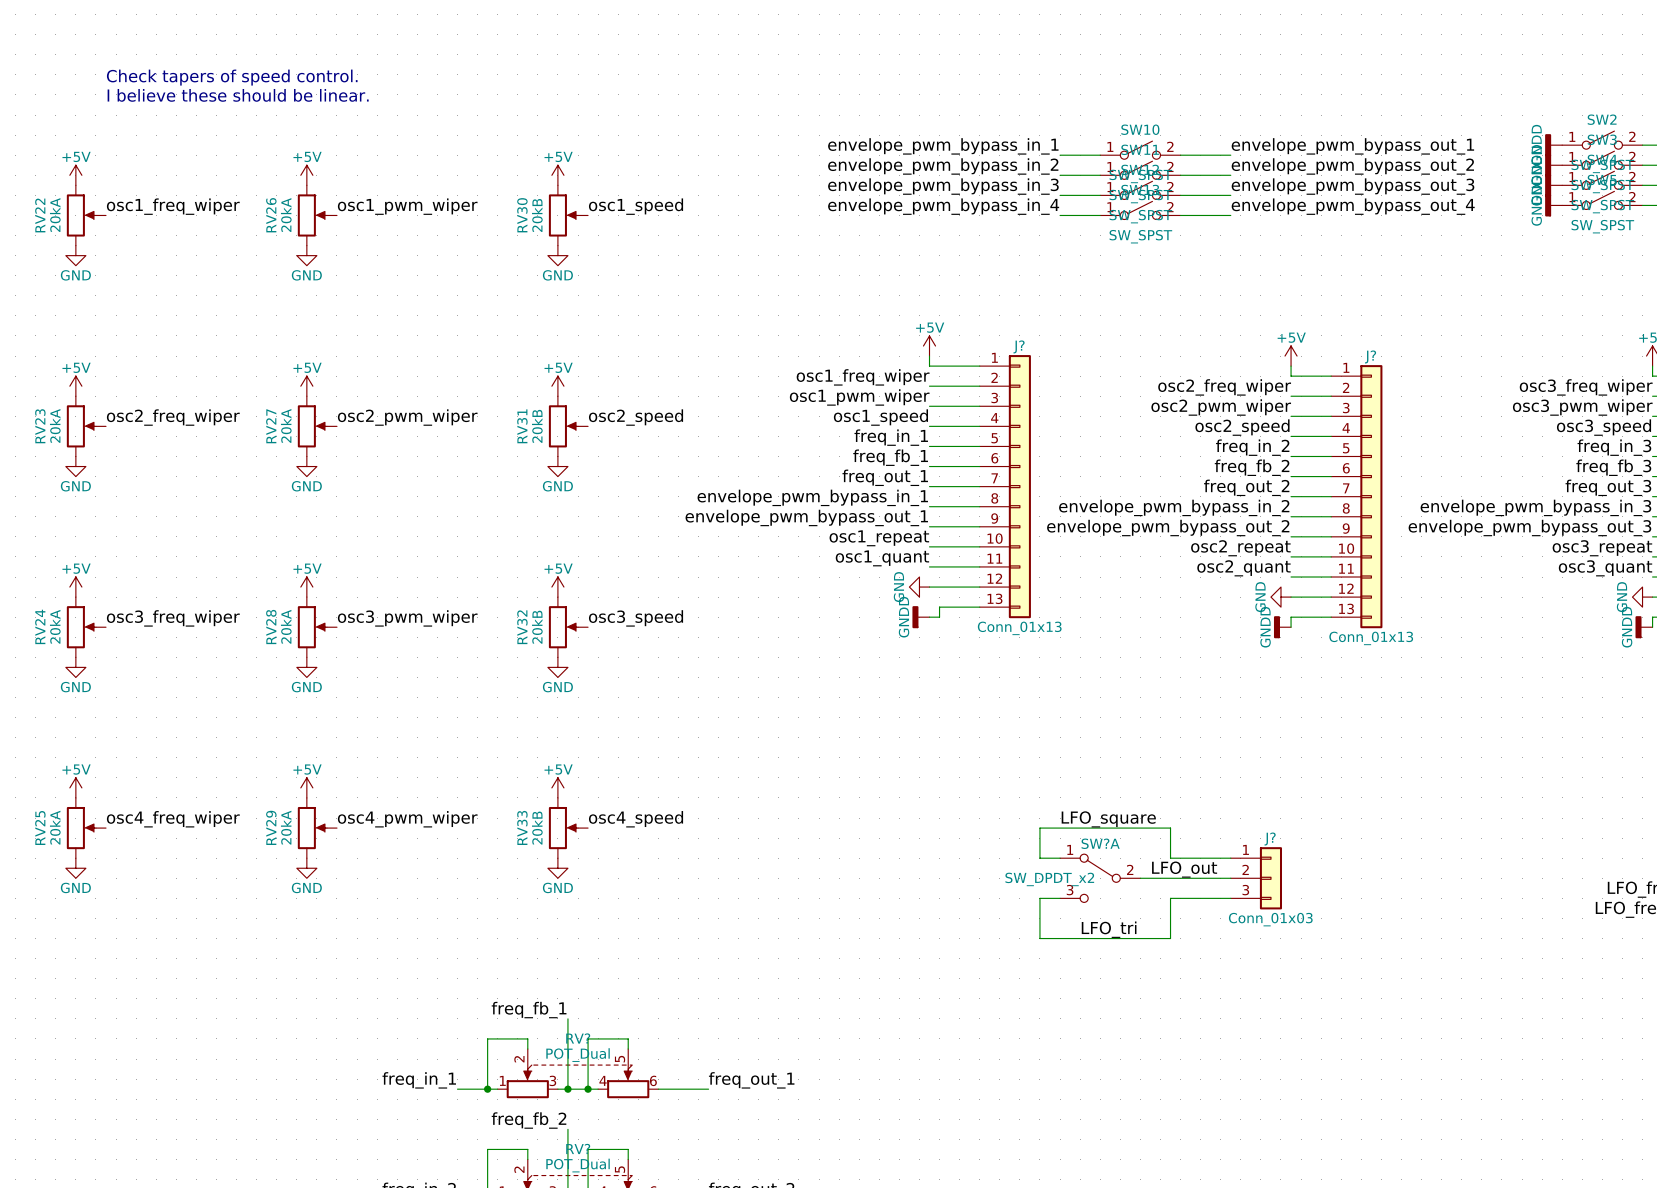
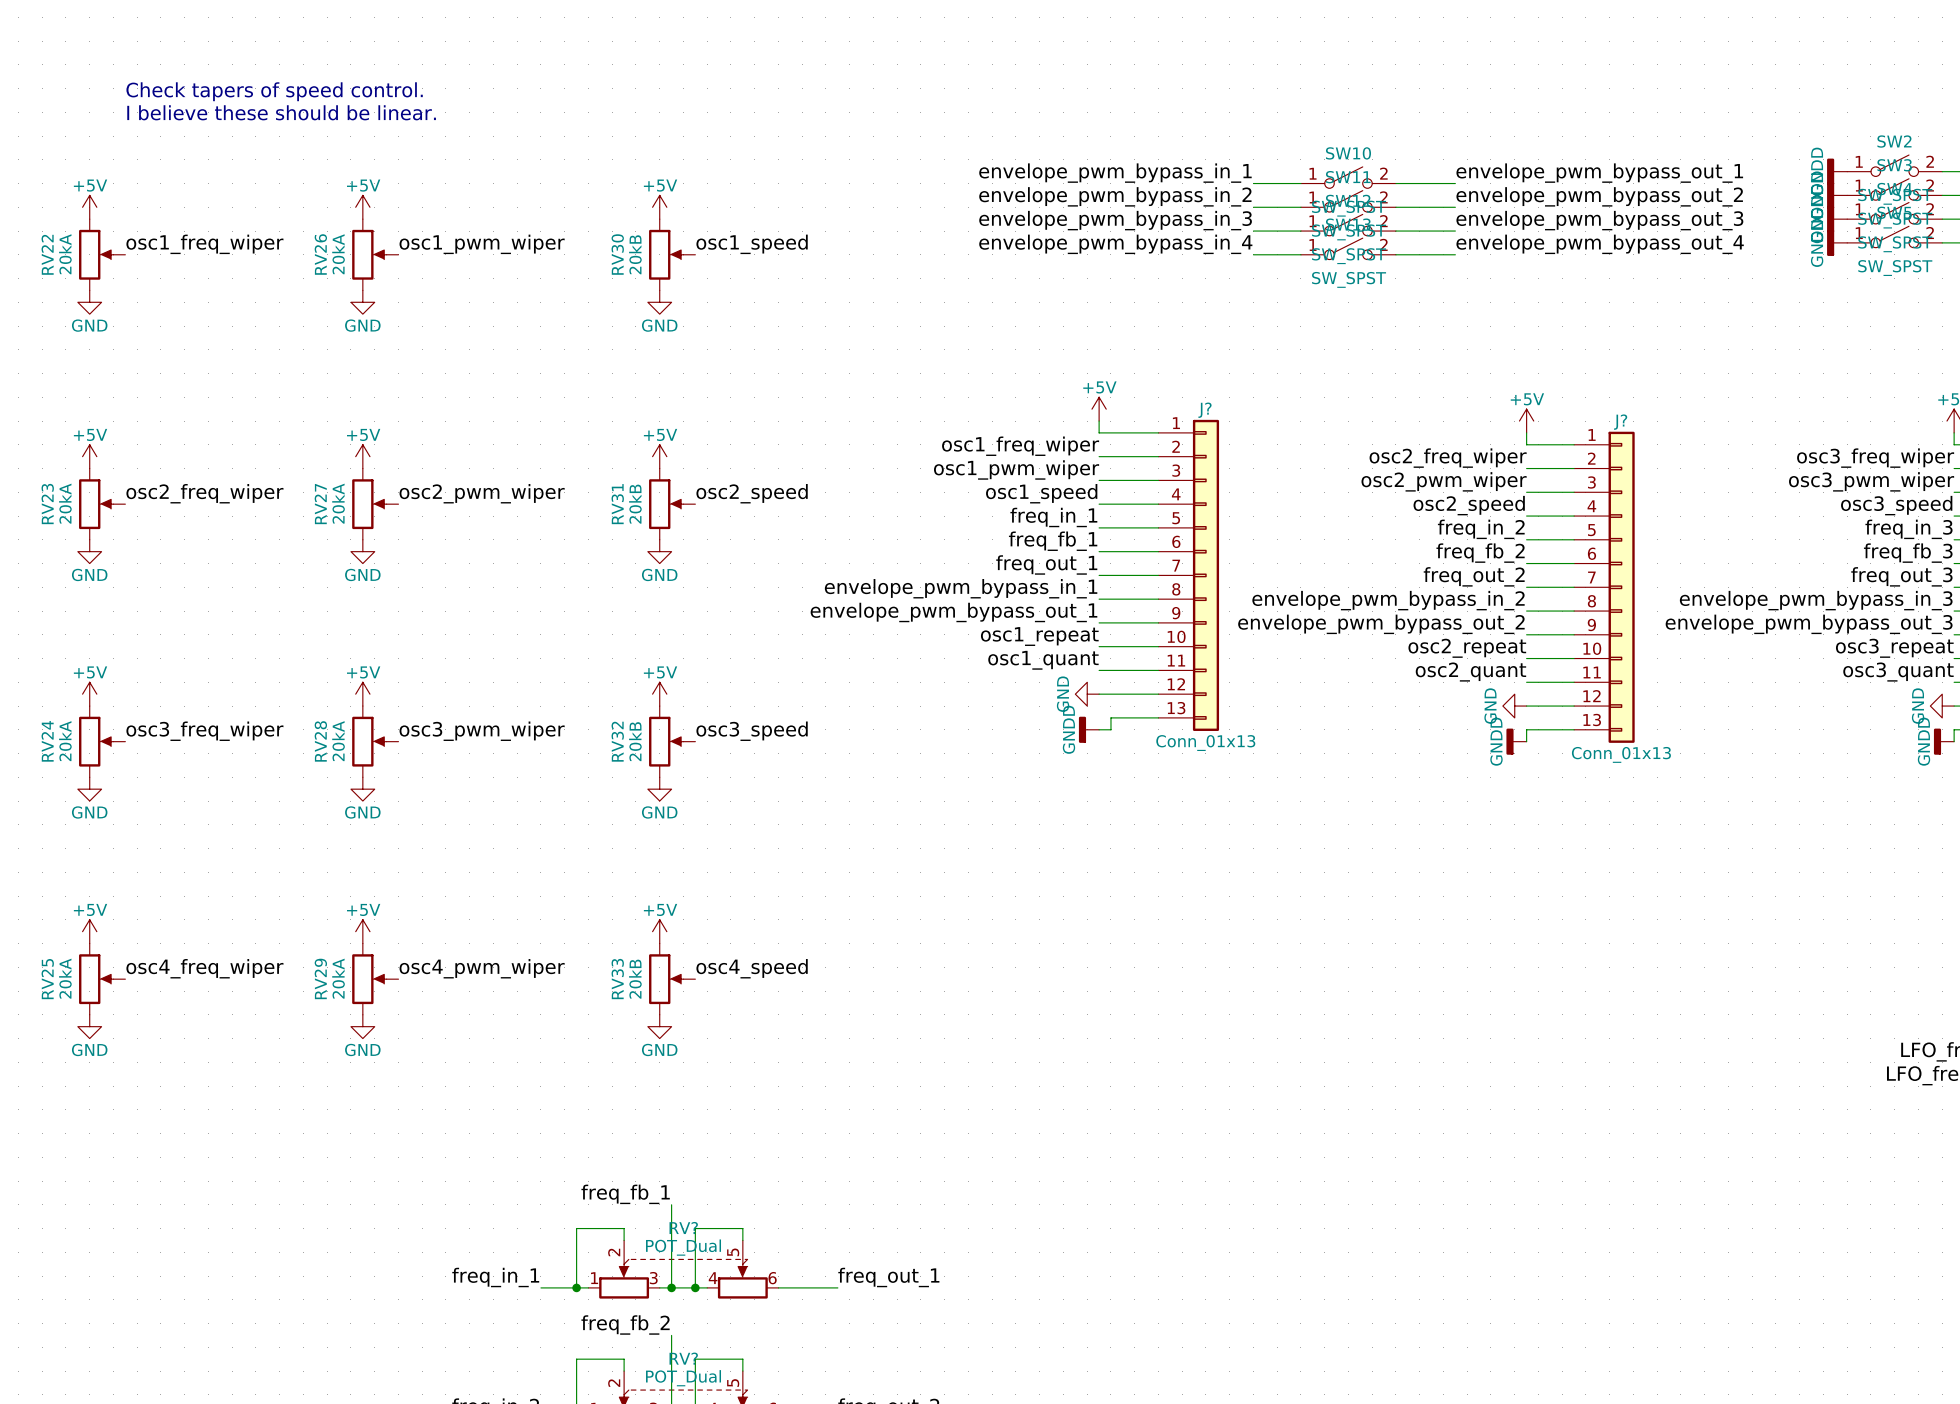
label: LFO_square (1108, 819) -> none
wire: (1060, 858) (1039, 858) (1039, 828) (1170, 828) (1170, 858) (1230, 858) -> none
label: LFO_out (1184, 869) -> none
SW?A: SW_DPDT_x2 (1100, 878) -> none
wire: (1140, 878) (1230, 878) -> none
J?: Conn_01x03 (1256, 878) -> none
wire: (1060, 898) (1039, 898) (1039, 938) (1170, 938) (1170, 898) (1230, 898) -> none
label: LFO_tri (1109, 929) -> none

